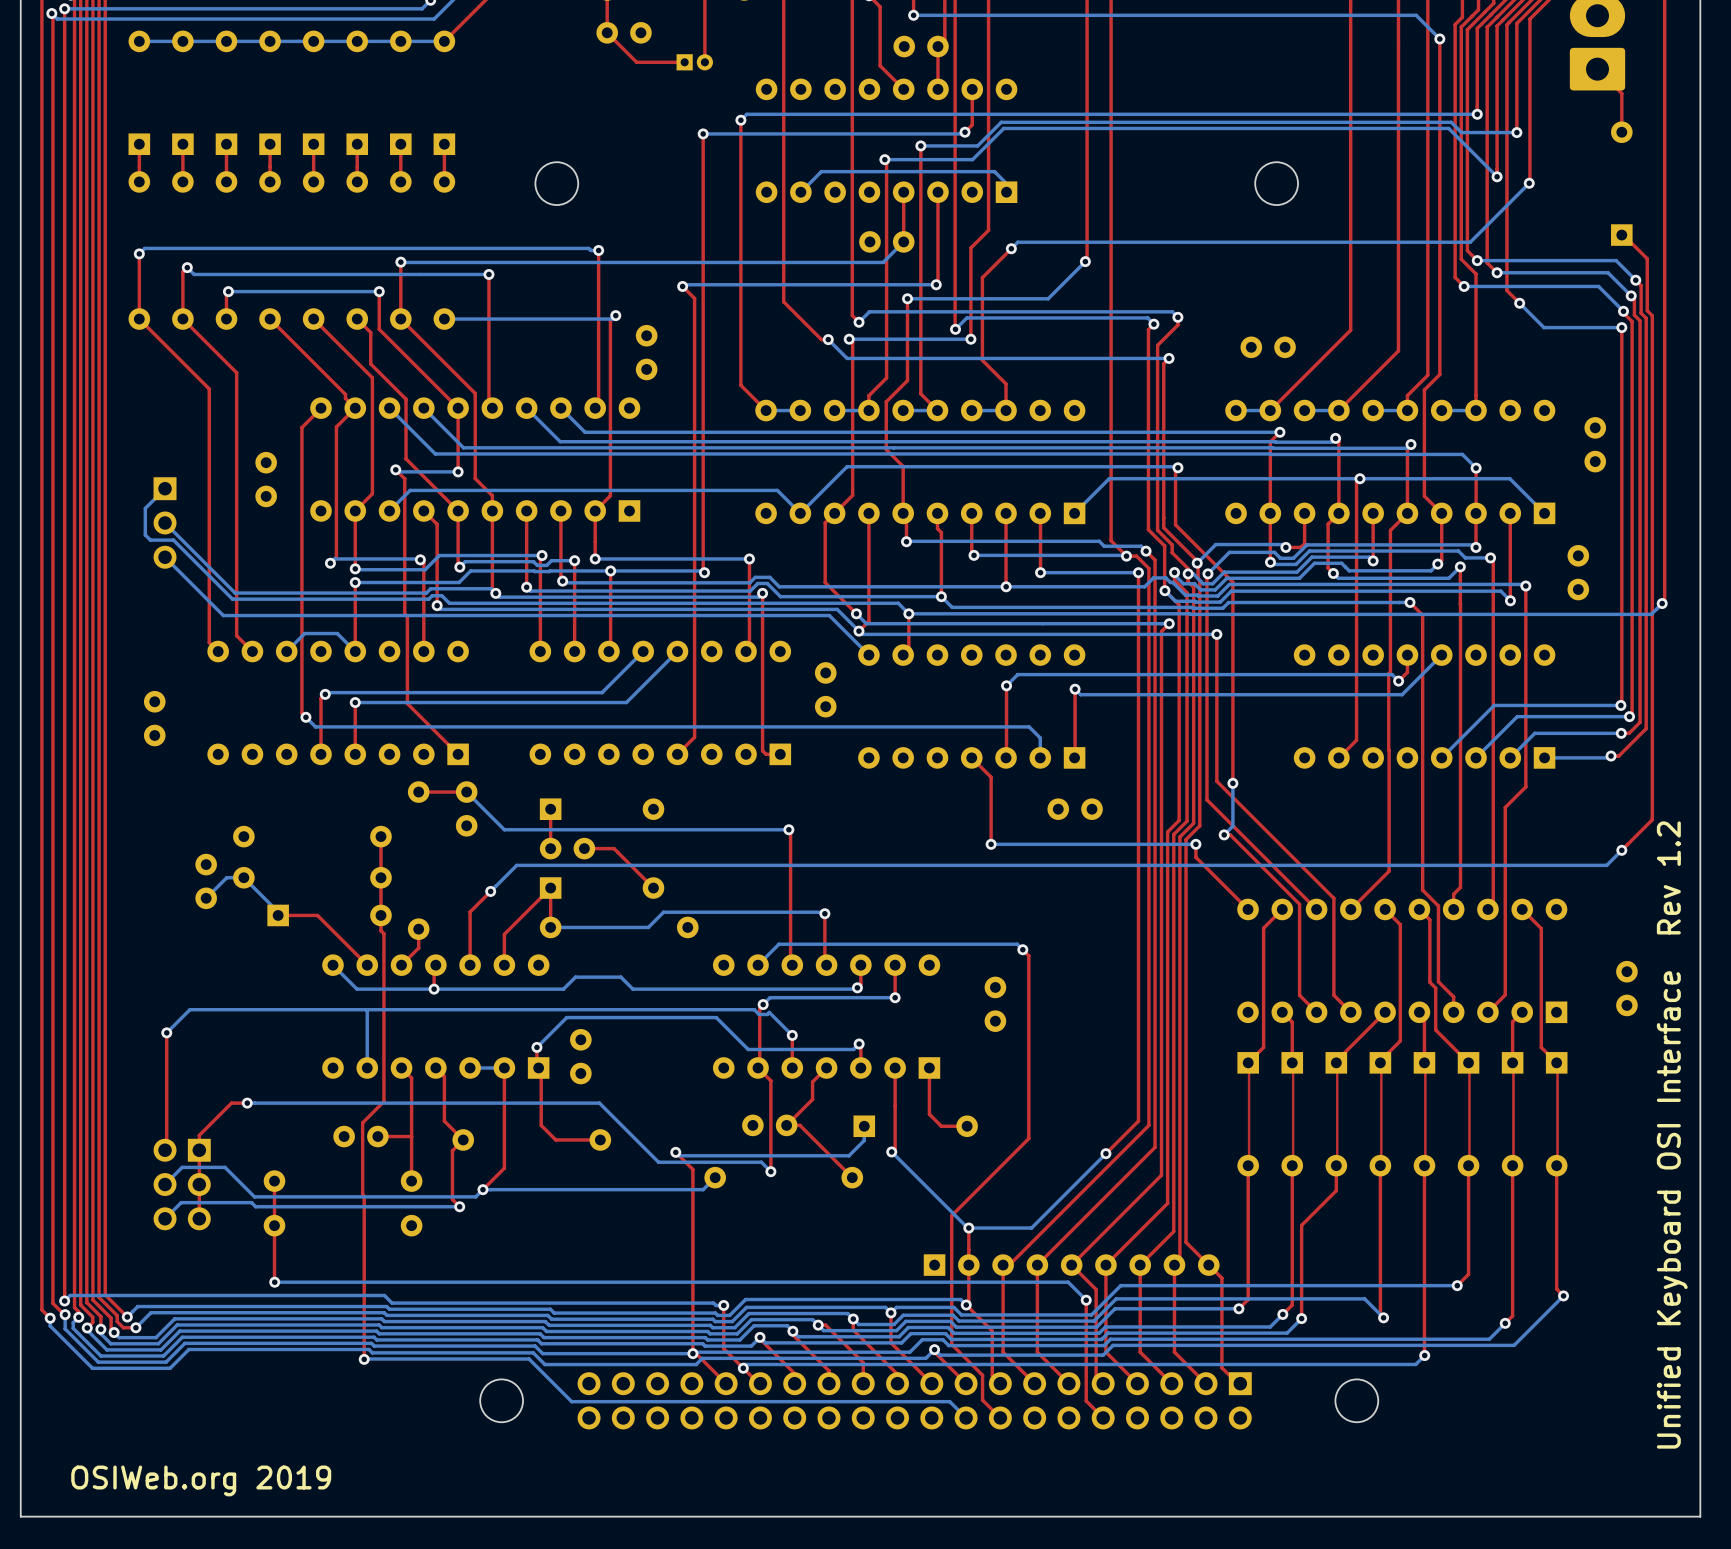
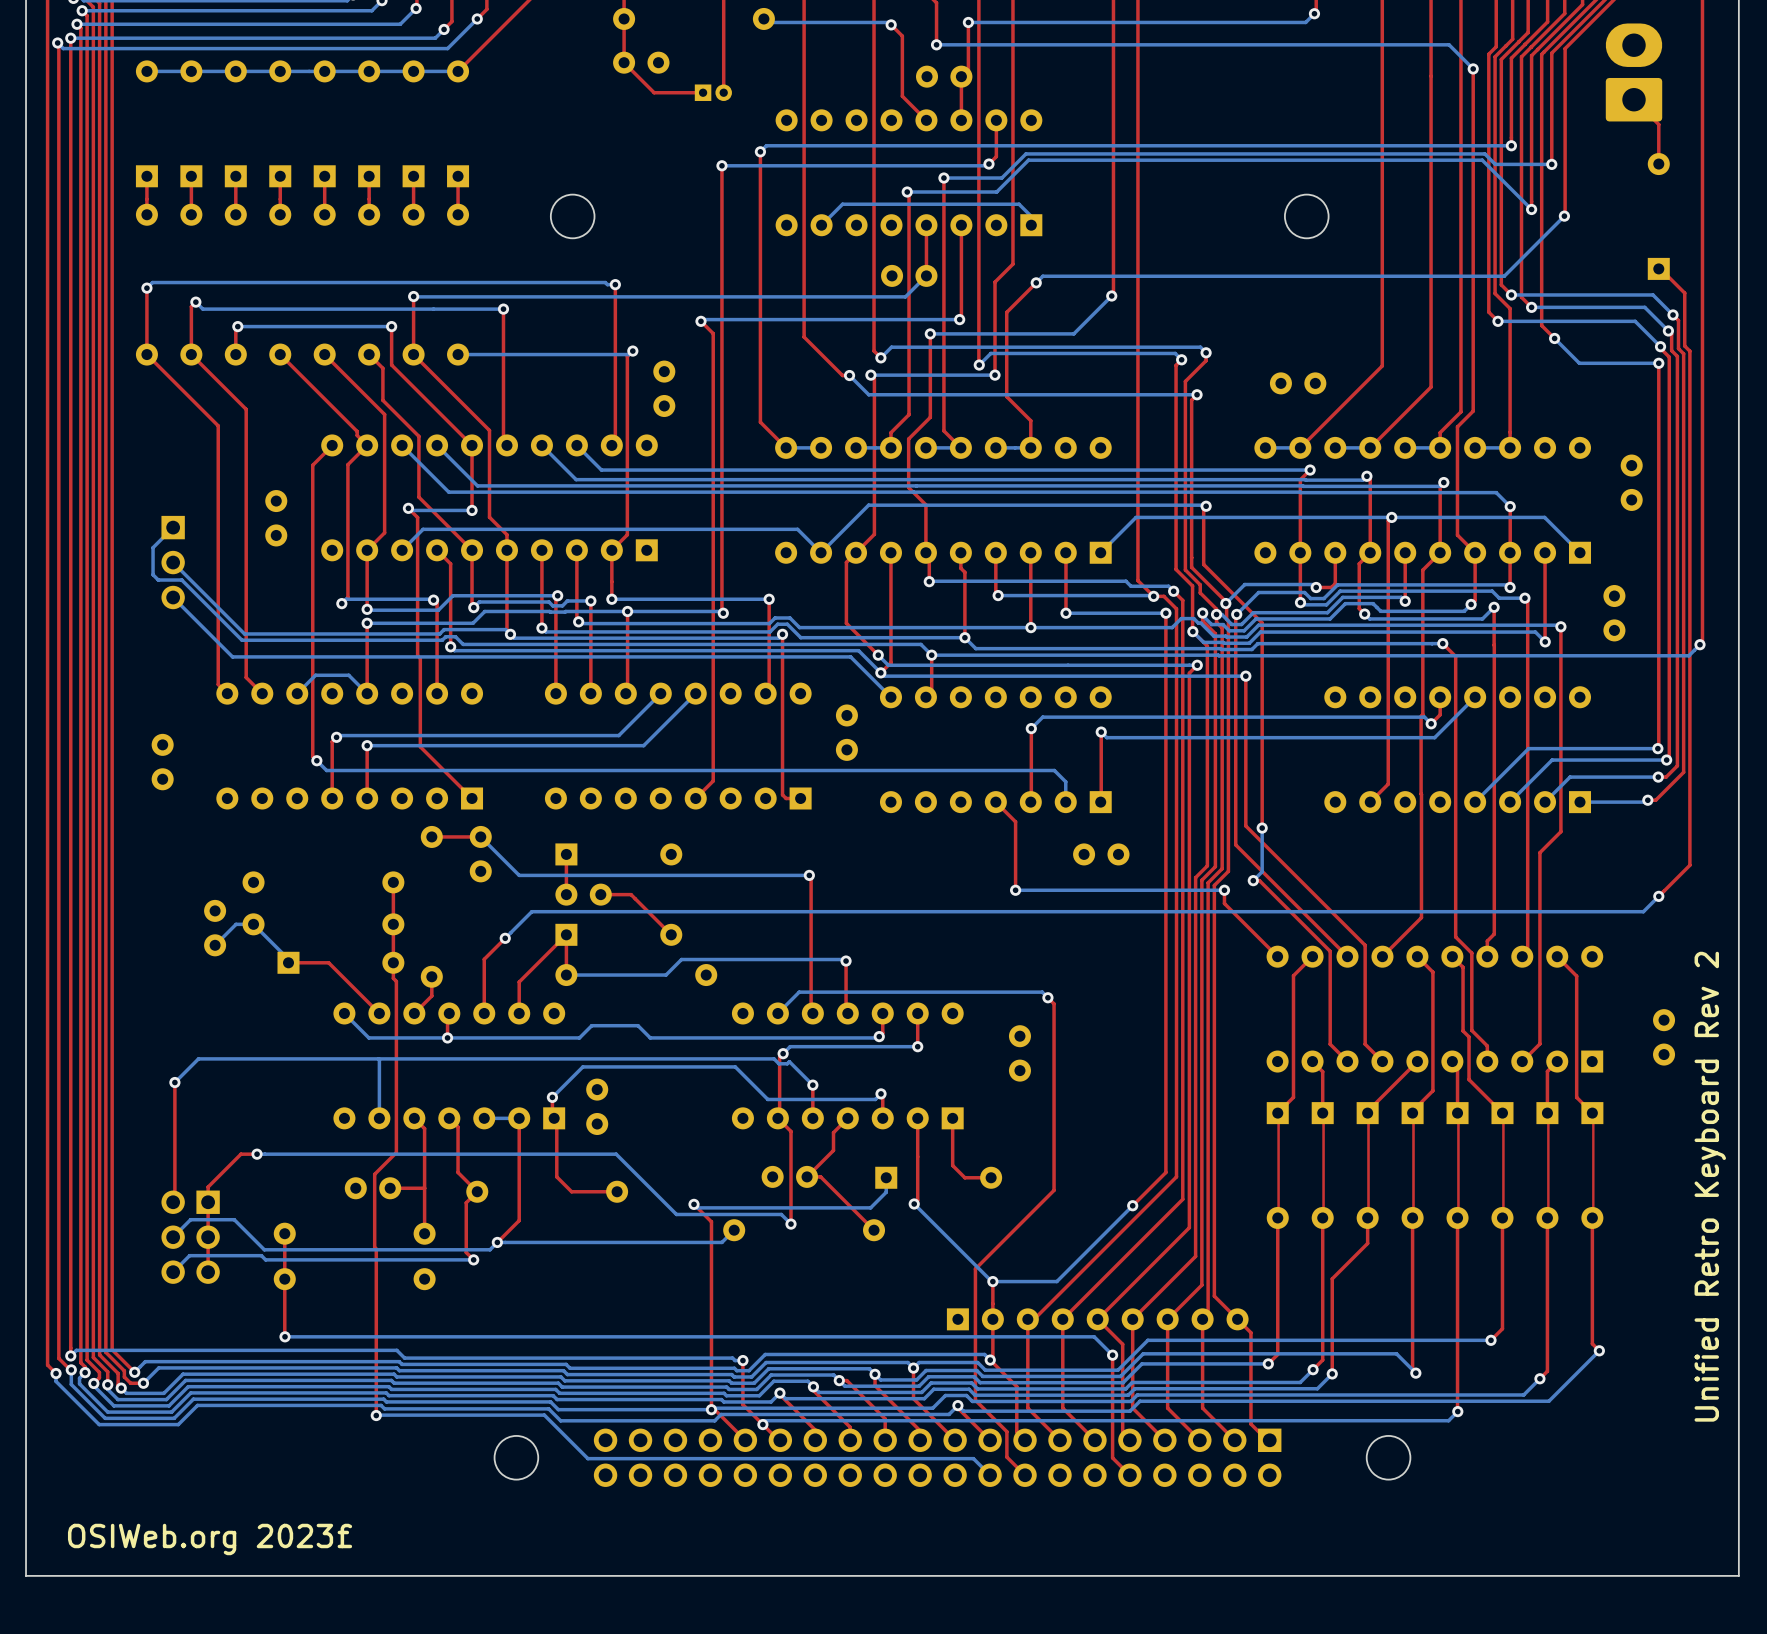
text: Unified Keyboard OSI Interface Rev 1.2 (1672, 1135) -> Unified Retro Keyboard Rev 2 (1710, 1186)
text: OSIWeb.org 2019 (201, 1480) -> OSIWeb.org 2023£ (210, 1539)

